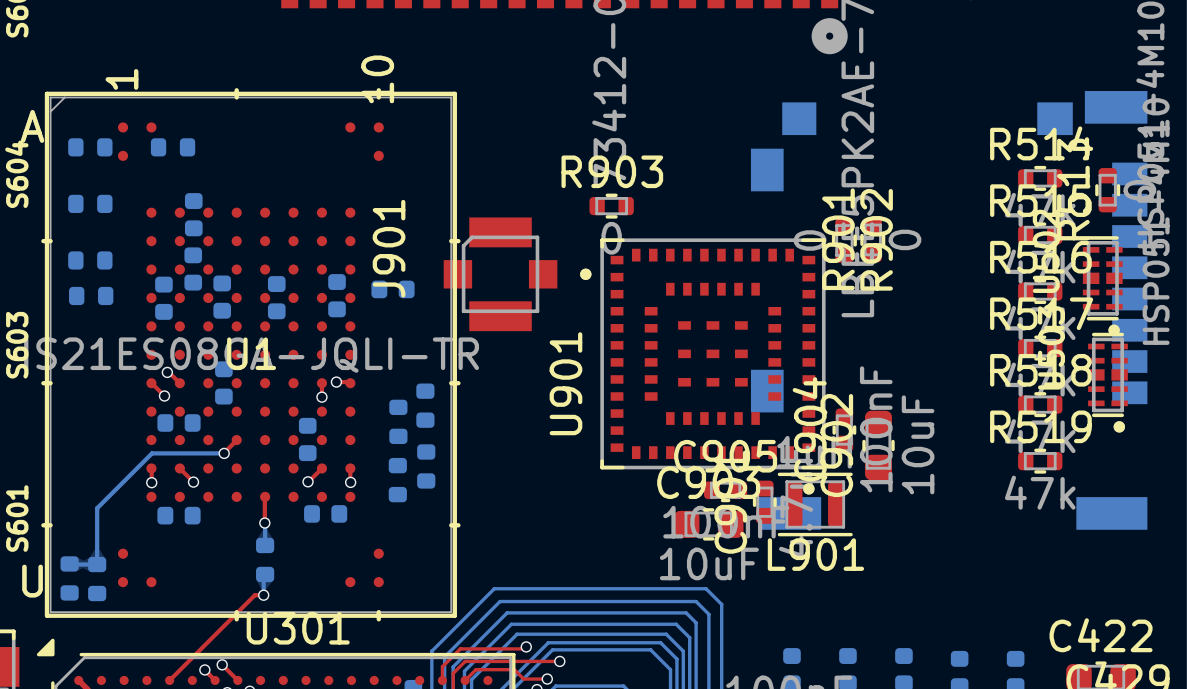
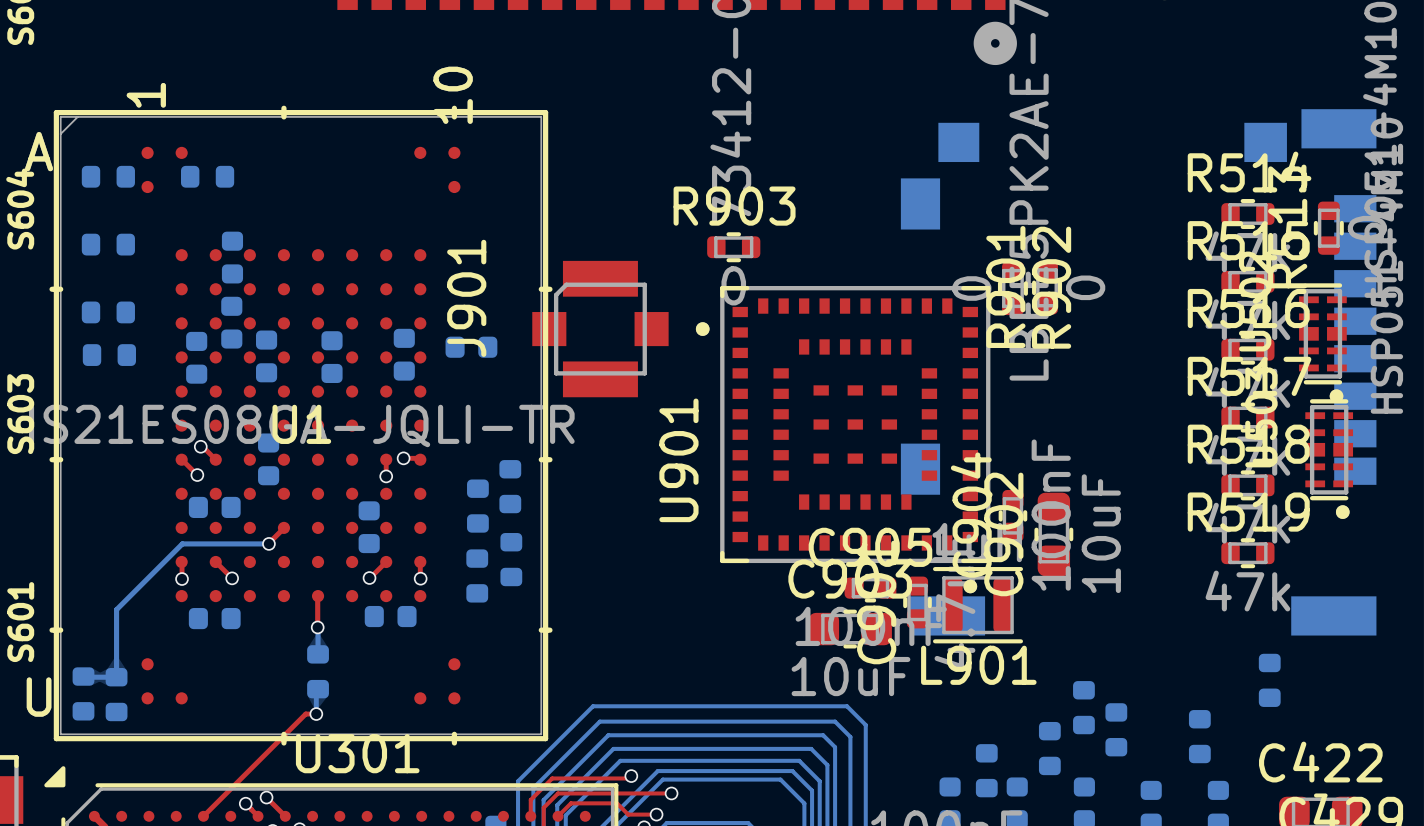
part: none -> (1269, 680)
part: none -> (1083, 707)
part: none -> (1116, 729)
part: none -> (1199, 736)
part: none -> (1049, 748)
part: none -> (986, 770)

